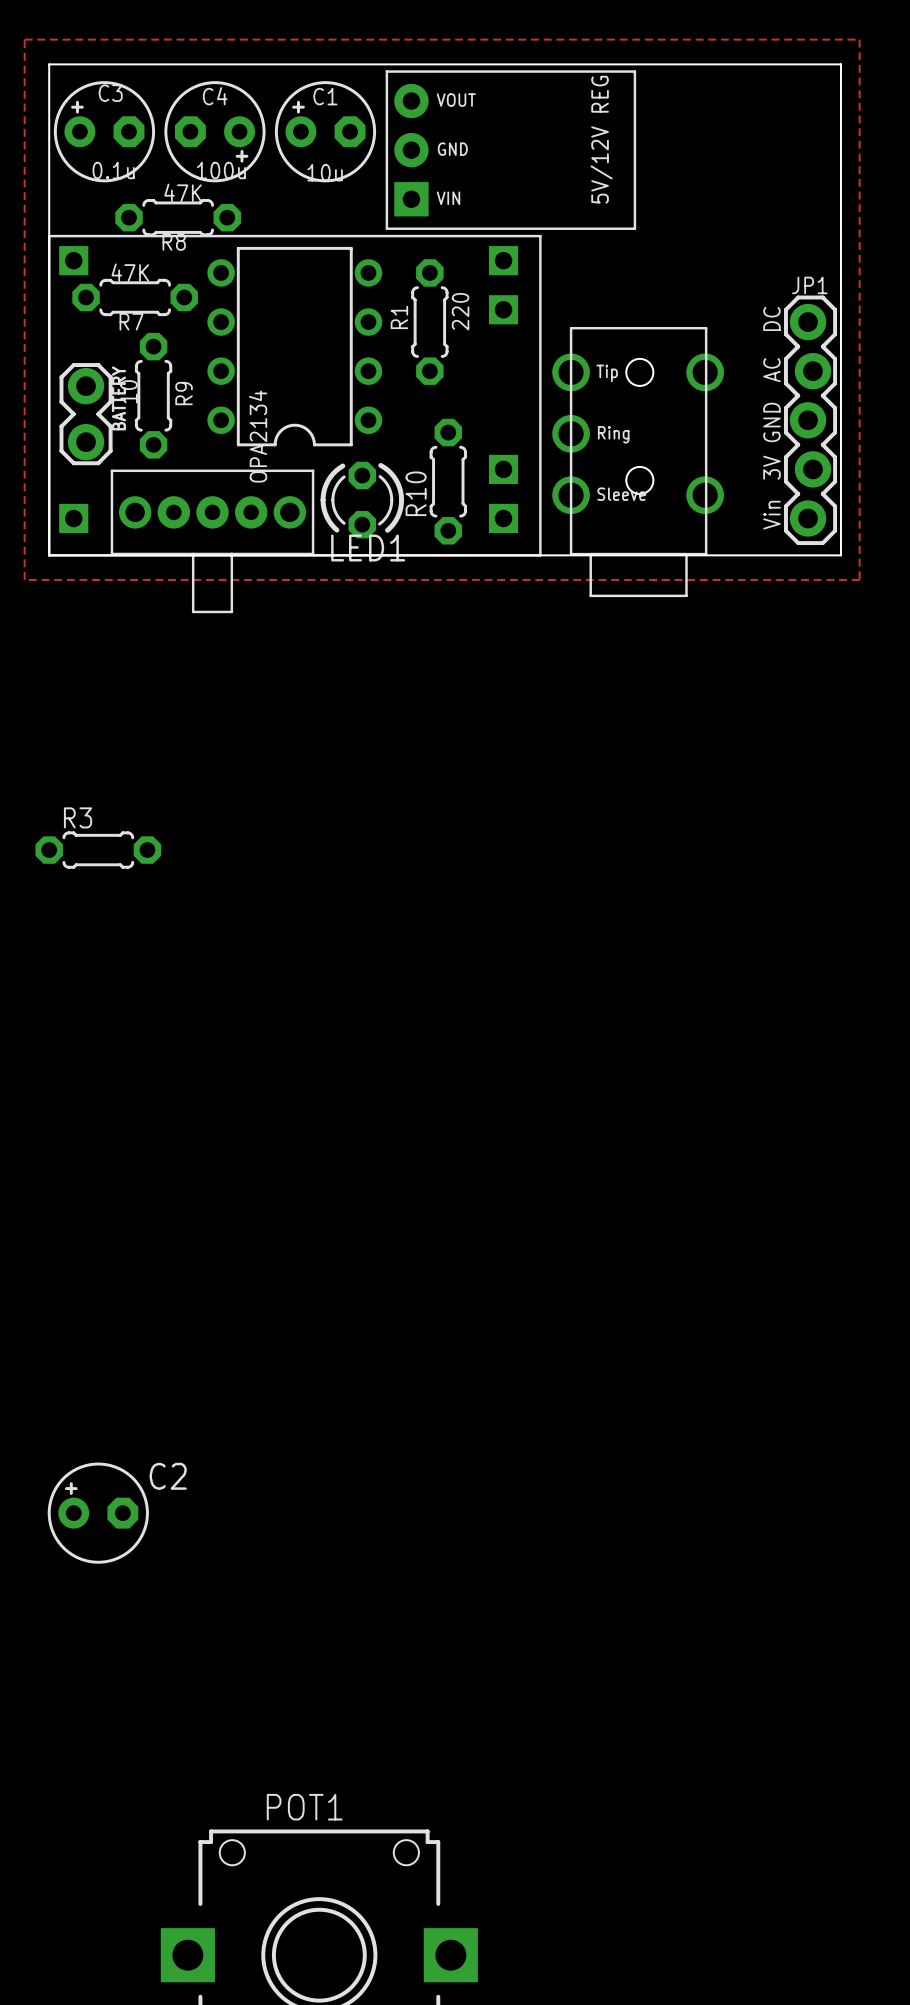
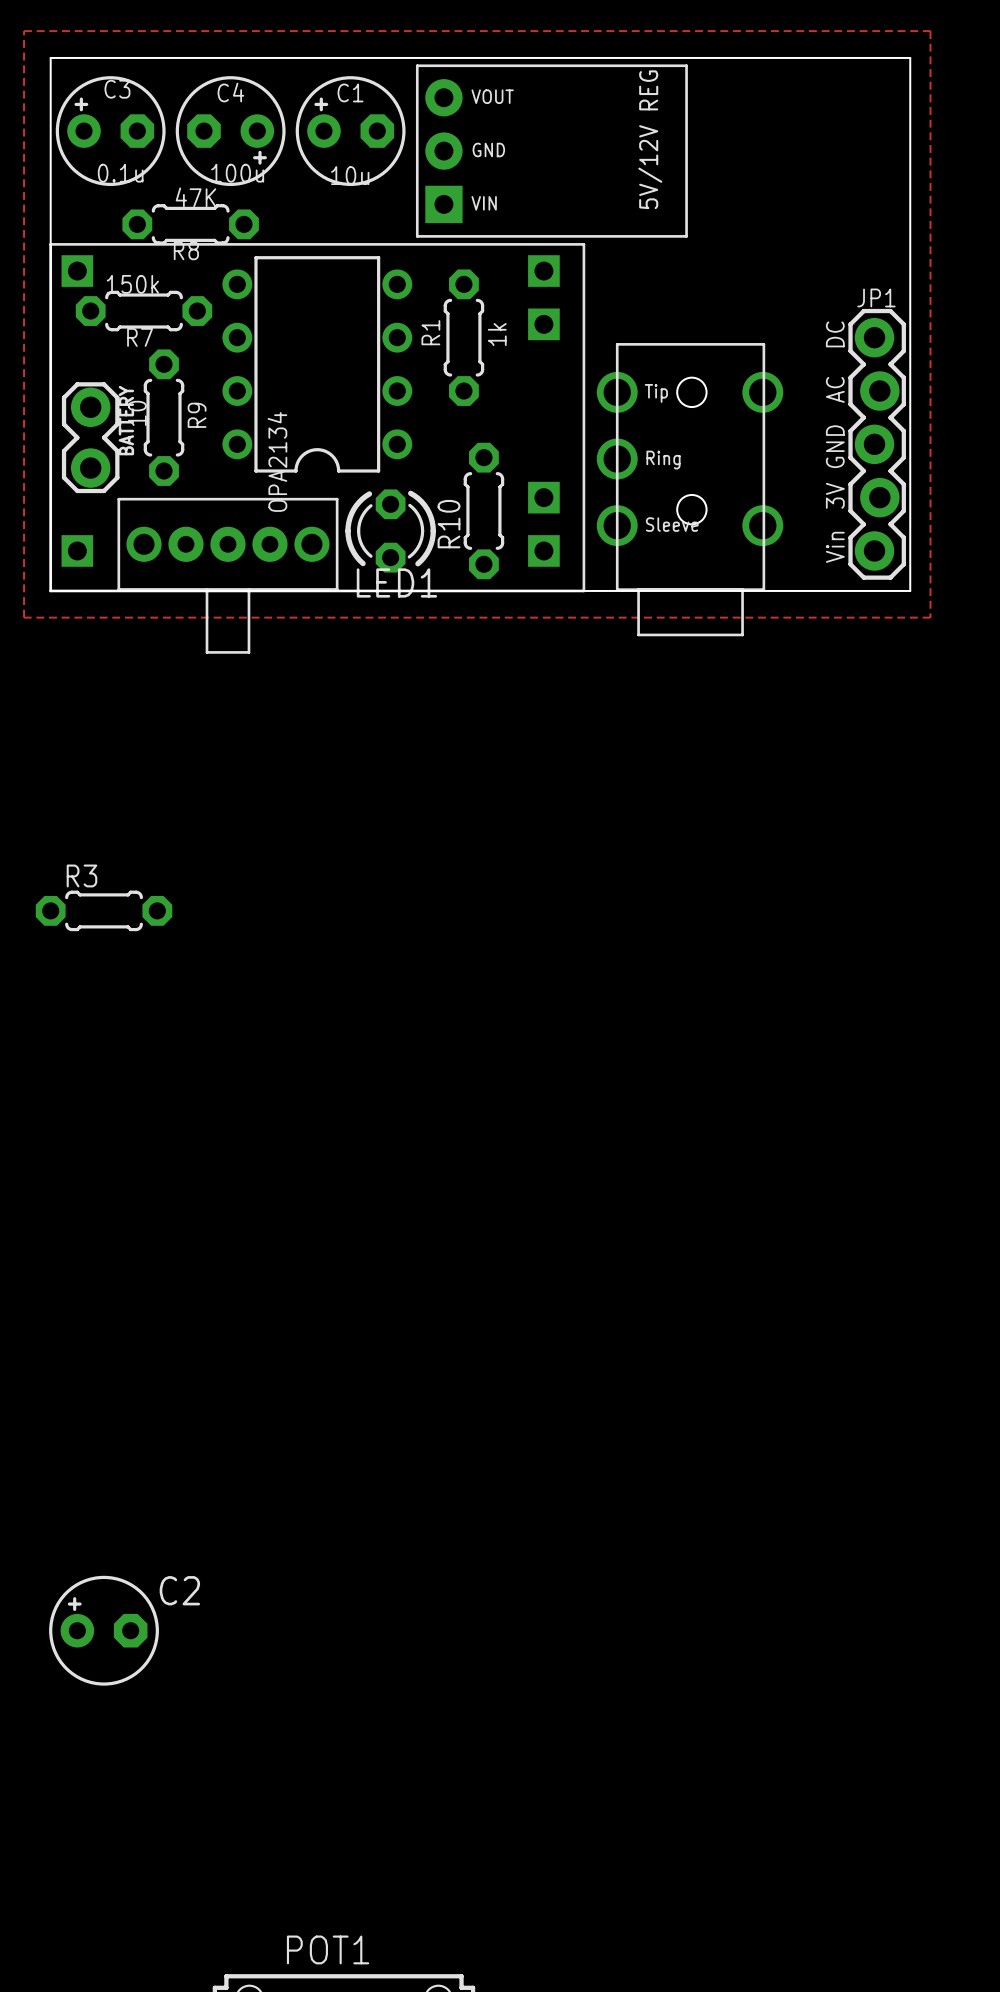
R7 value: 47K (130, 272) -> 150k (132, 284)
R1 value: 220 (460, 311) -> 1k (497, 334)

